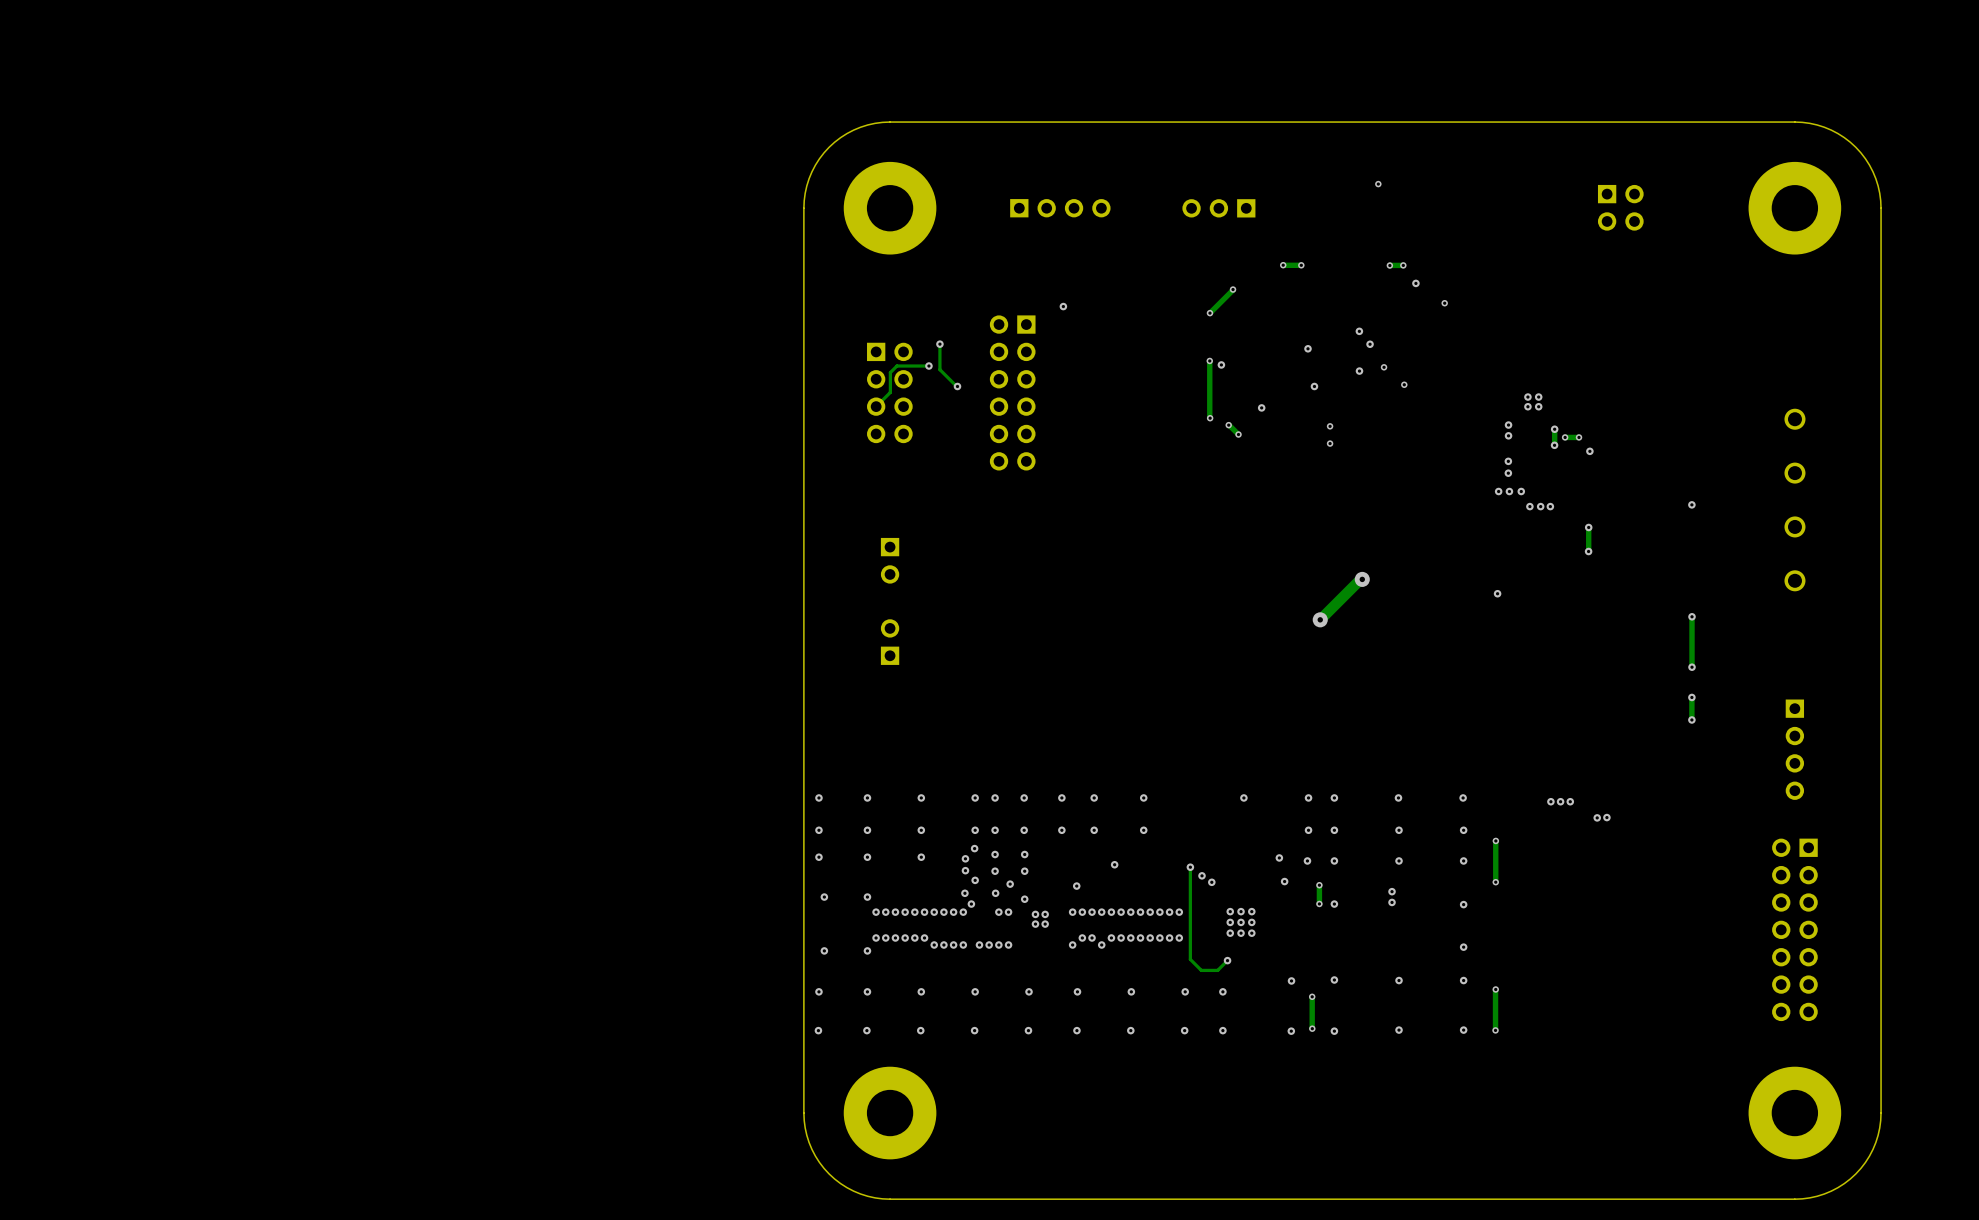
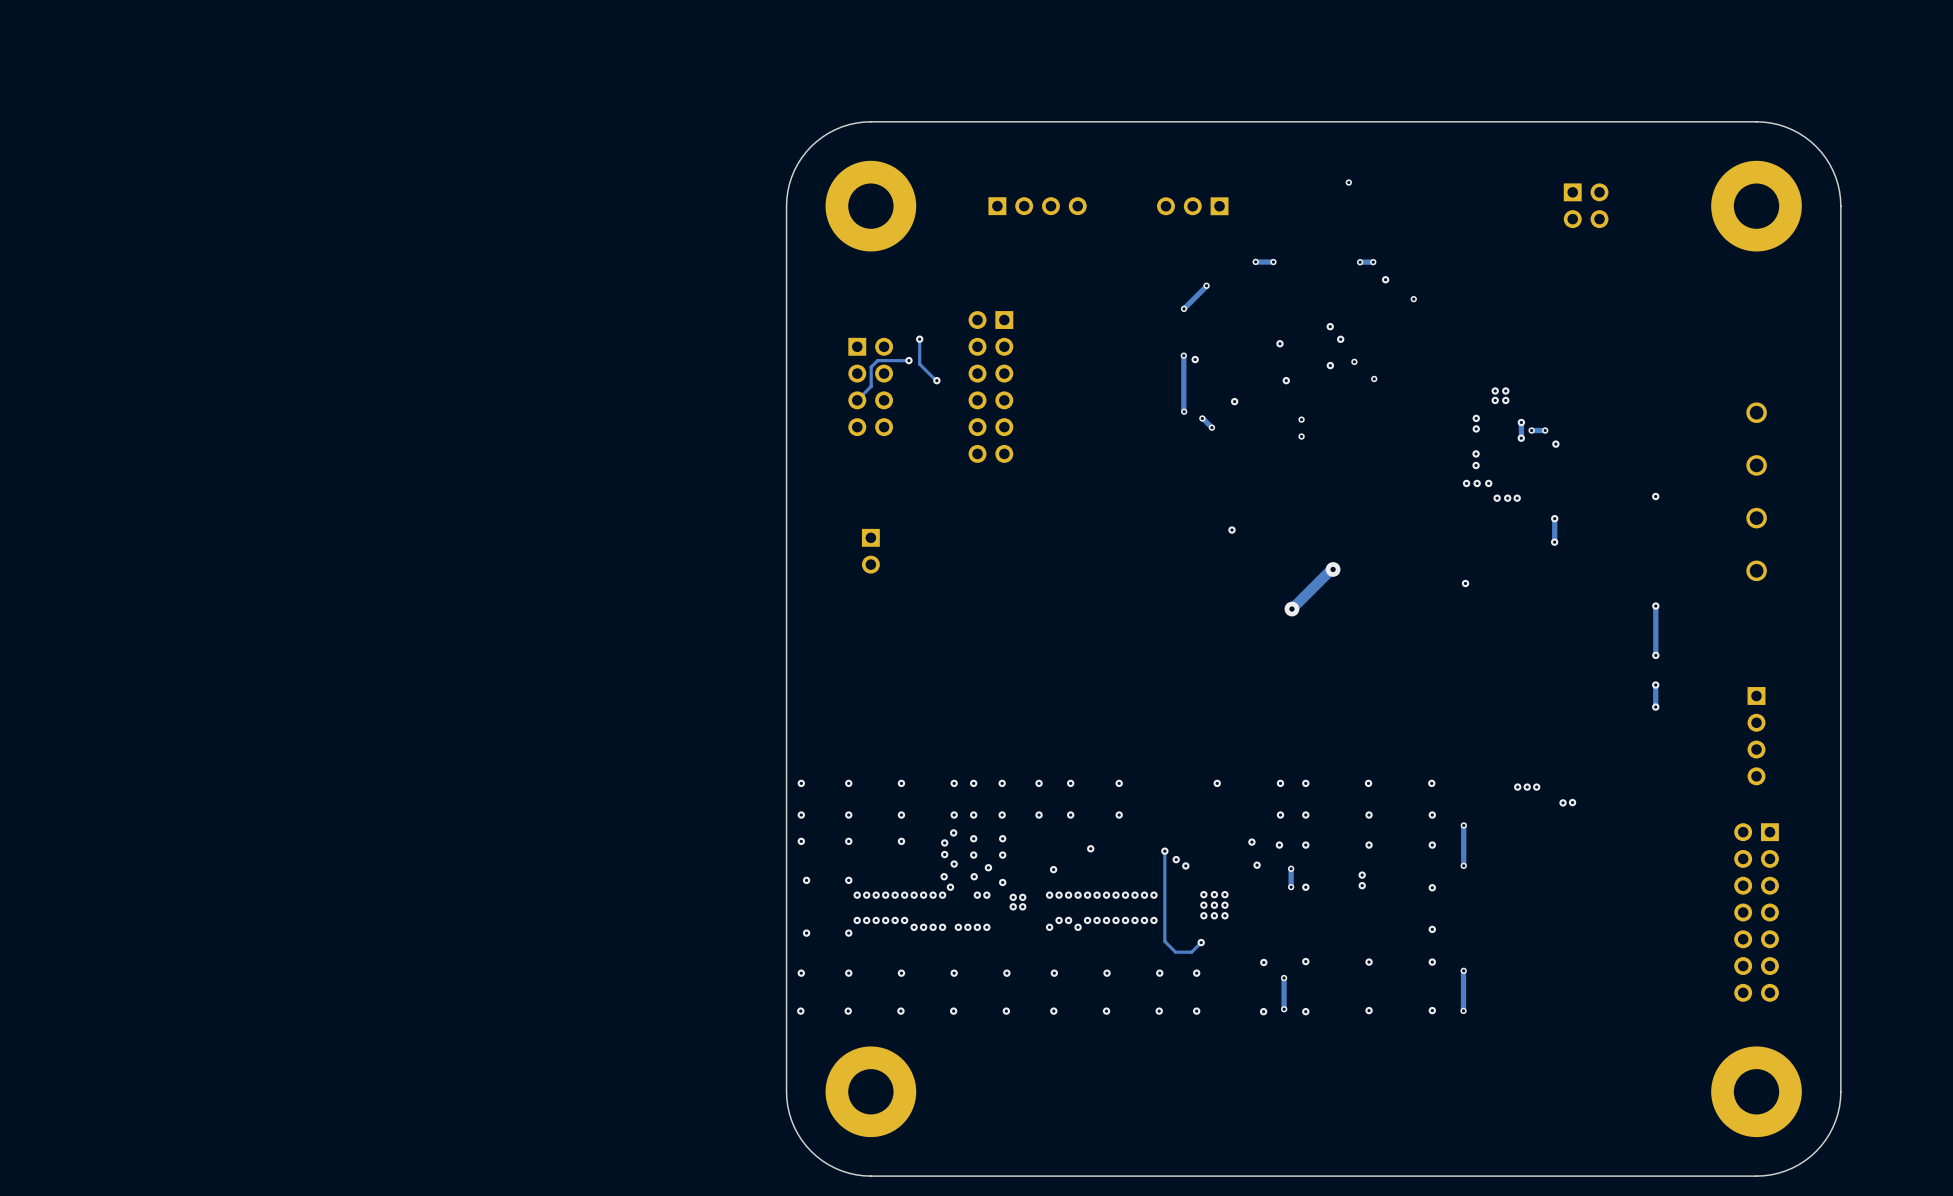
via: (1063, 306) -> none
via: none -> (1231, 530)
part: (890, 642) -> none

